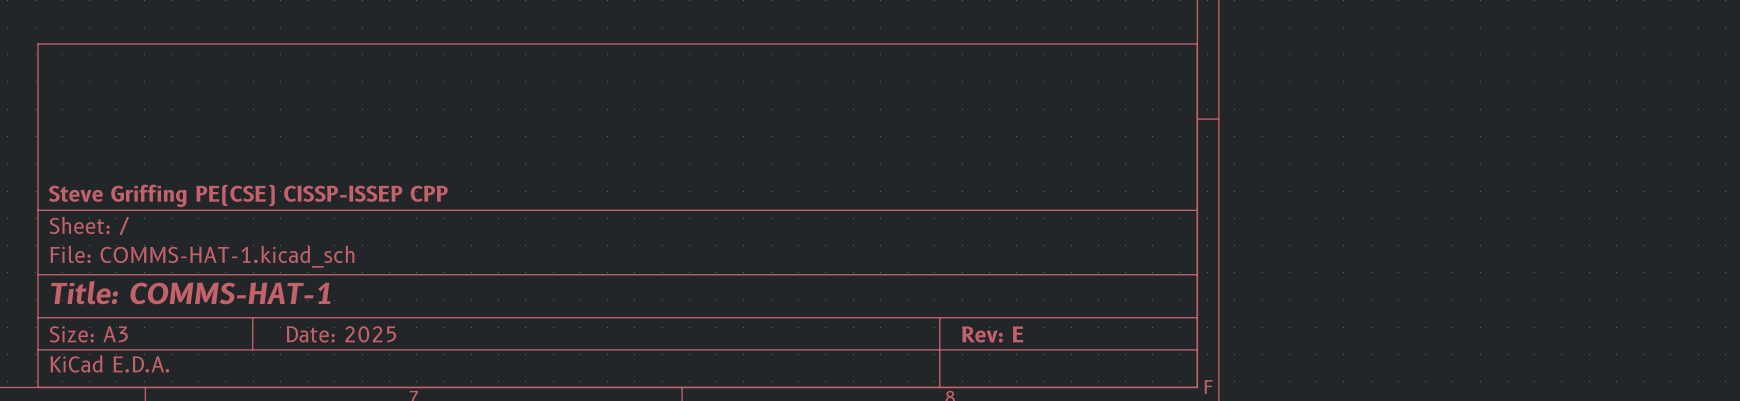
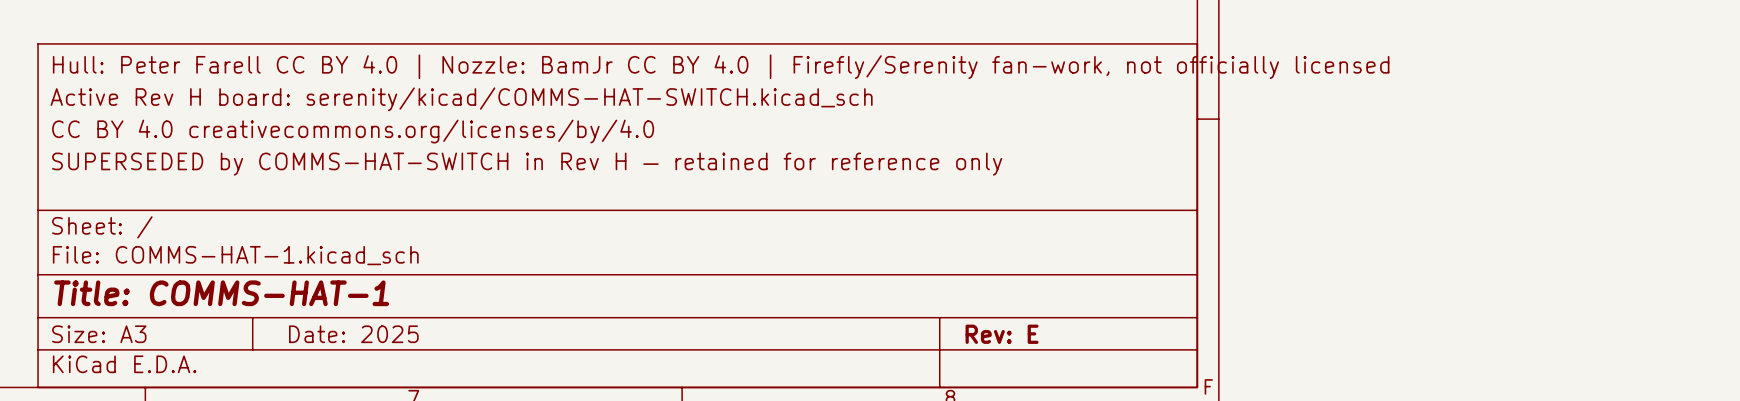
title block: none -> Hull: Peter Farell CC BY 4.0 | Nozzle: BamJr CC BY 4.0 | Firefly/Serenity fan-work, not officially licensed (721, 66)
title block: none -> Active Rev H board: serenity/kicad/COMMS-HAT-SWITCH.kicad_sch (461, 99)
title block: none -> CC BY 4.0 creativecommons.org/licenses/by/4.0 (353, 131)
title block: none -> SUPERSEDED by COMMS-HAT-SWITCH in Rev H — retained for reference only (527, 164)
title block: Steve Griffing PE(CSE) CISSP-ISSEP CPP (248, 195) -> none

